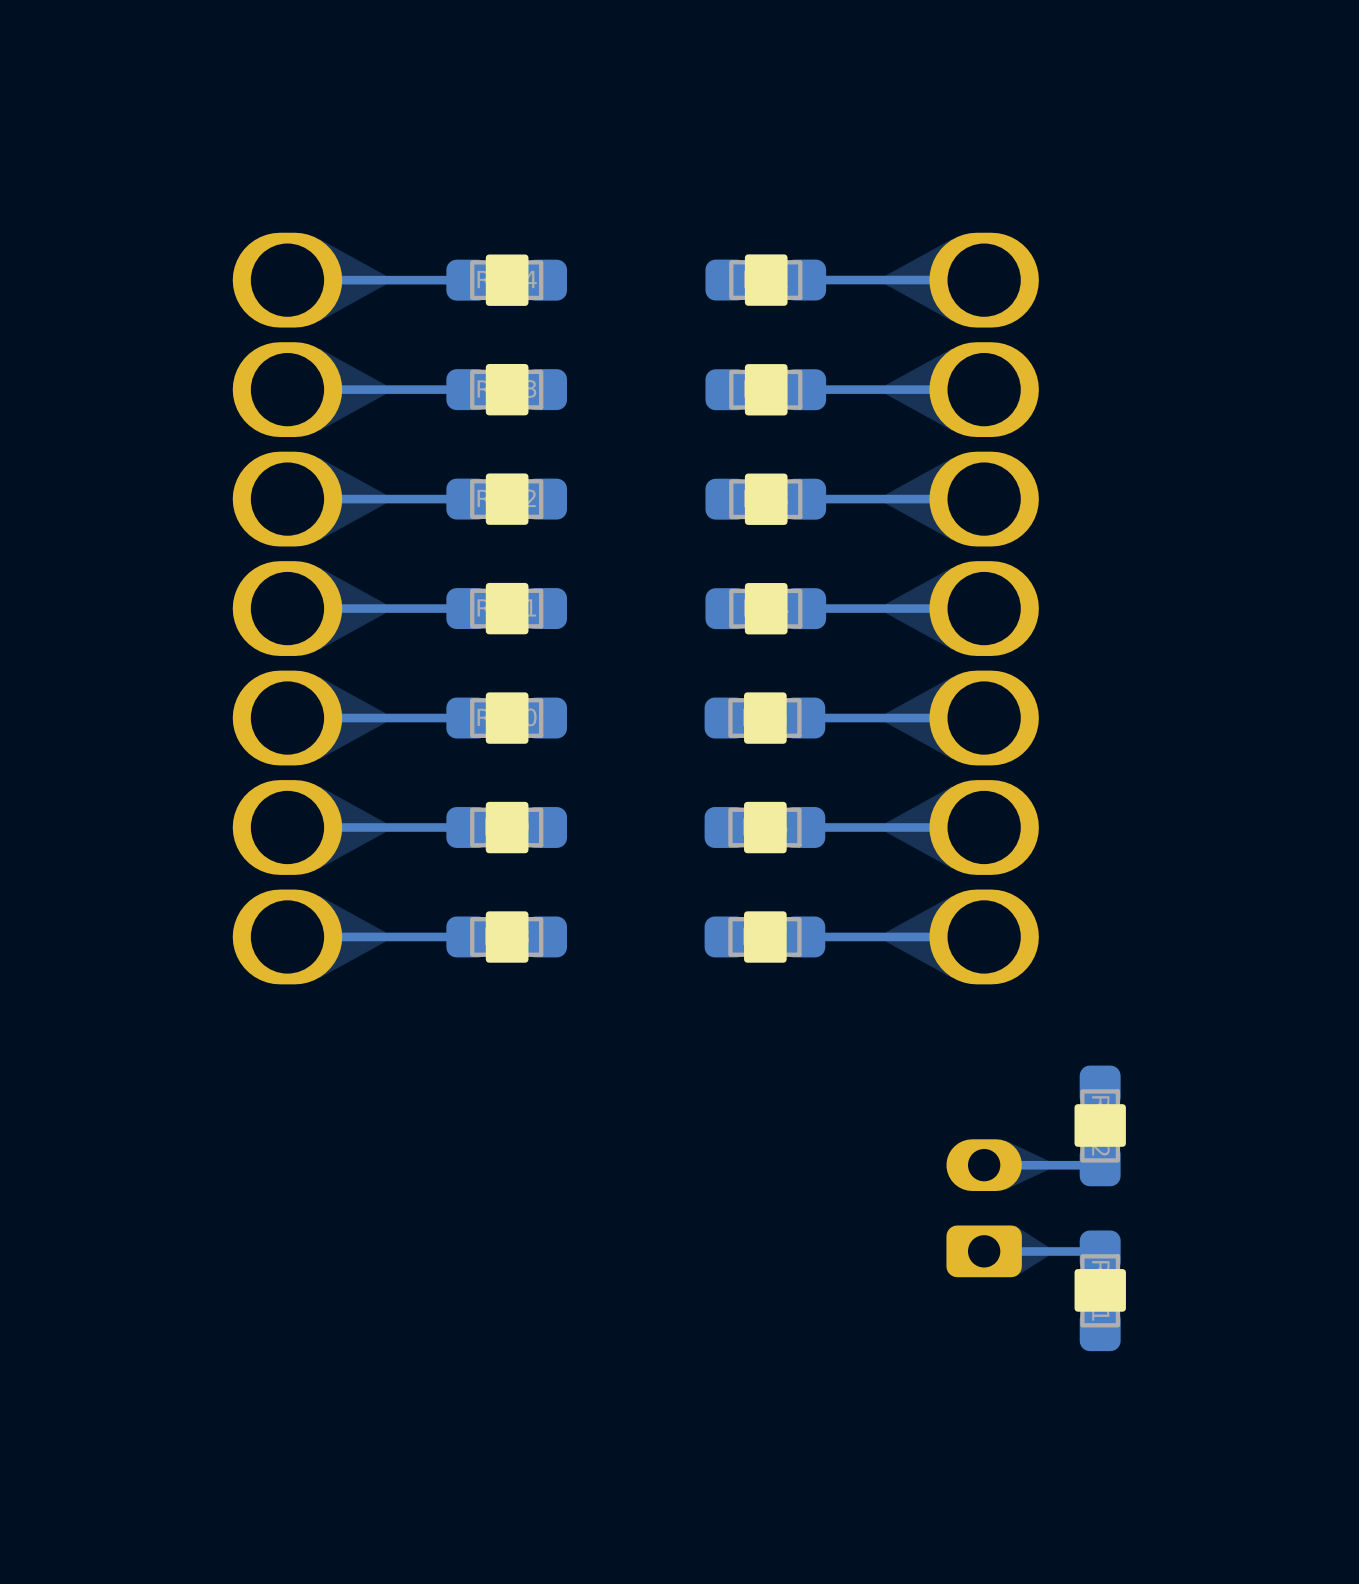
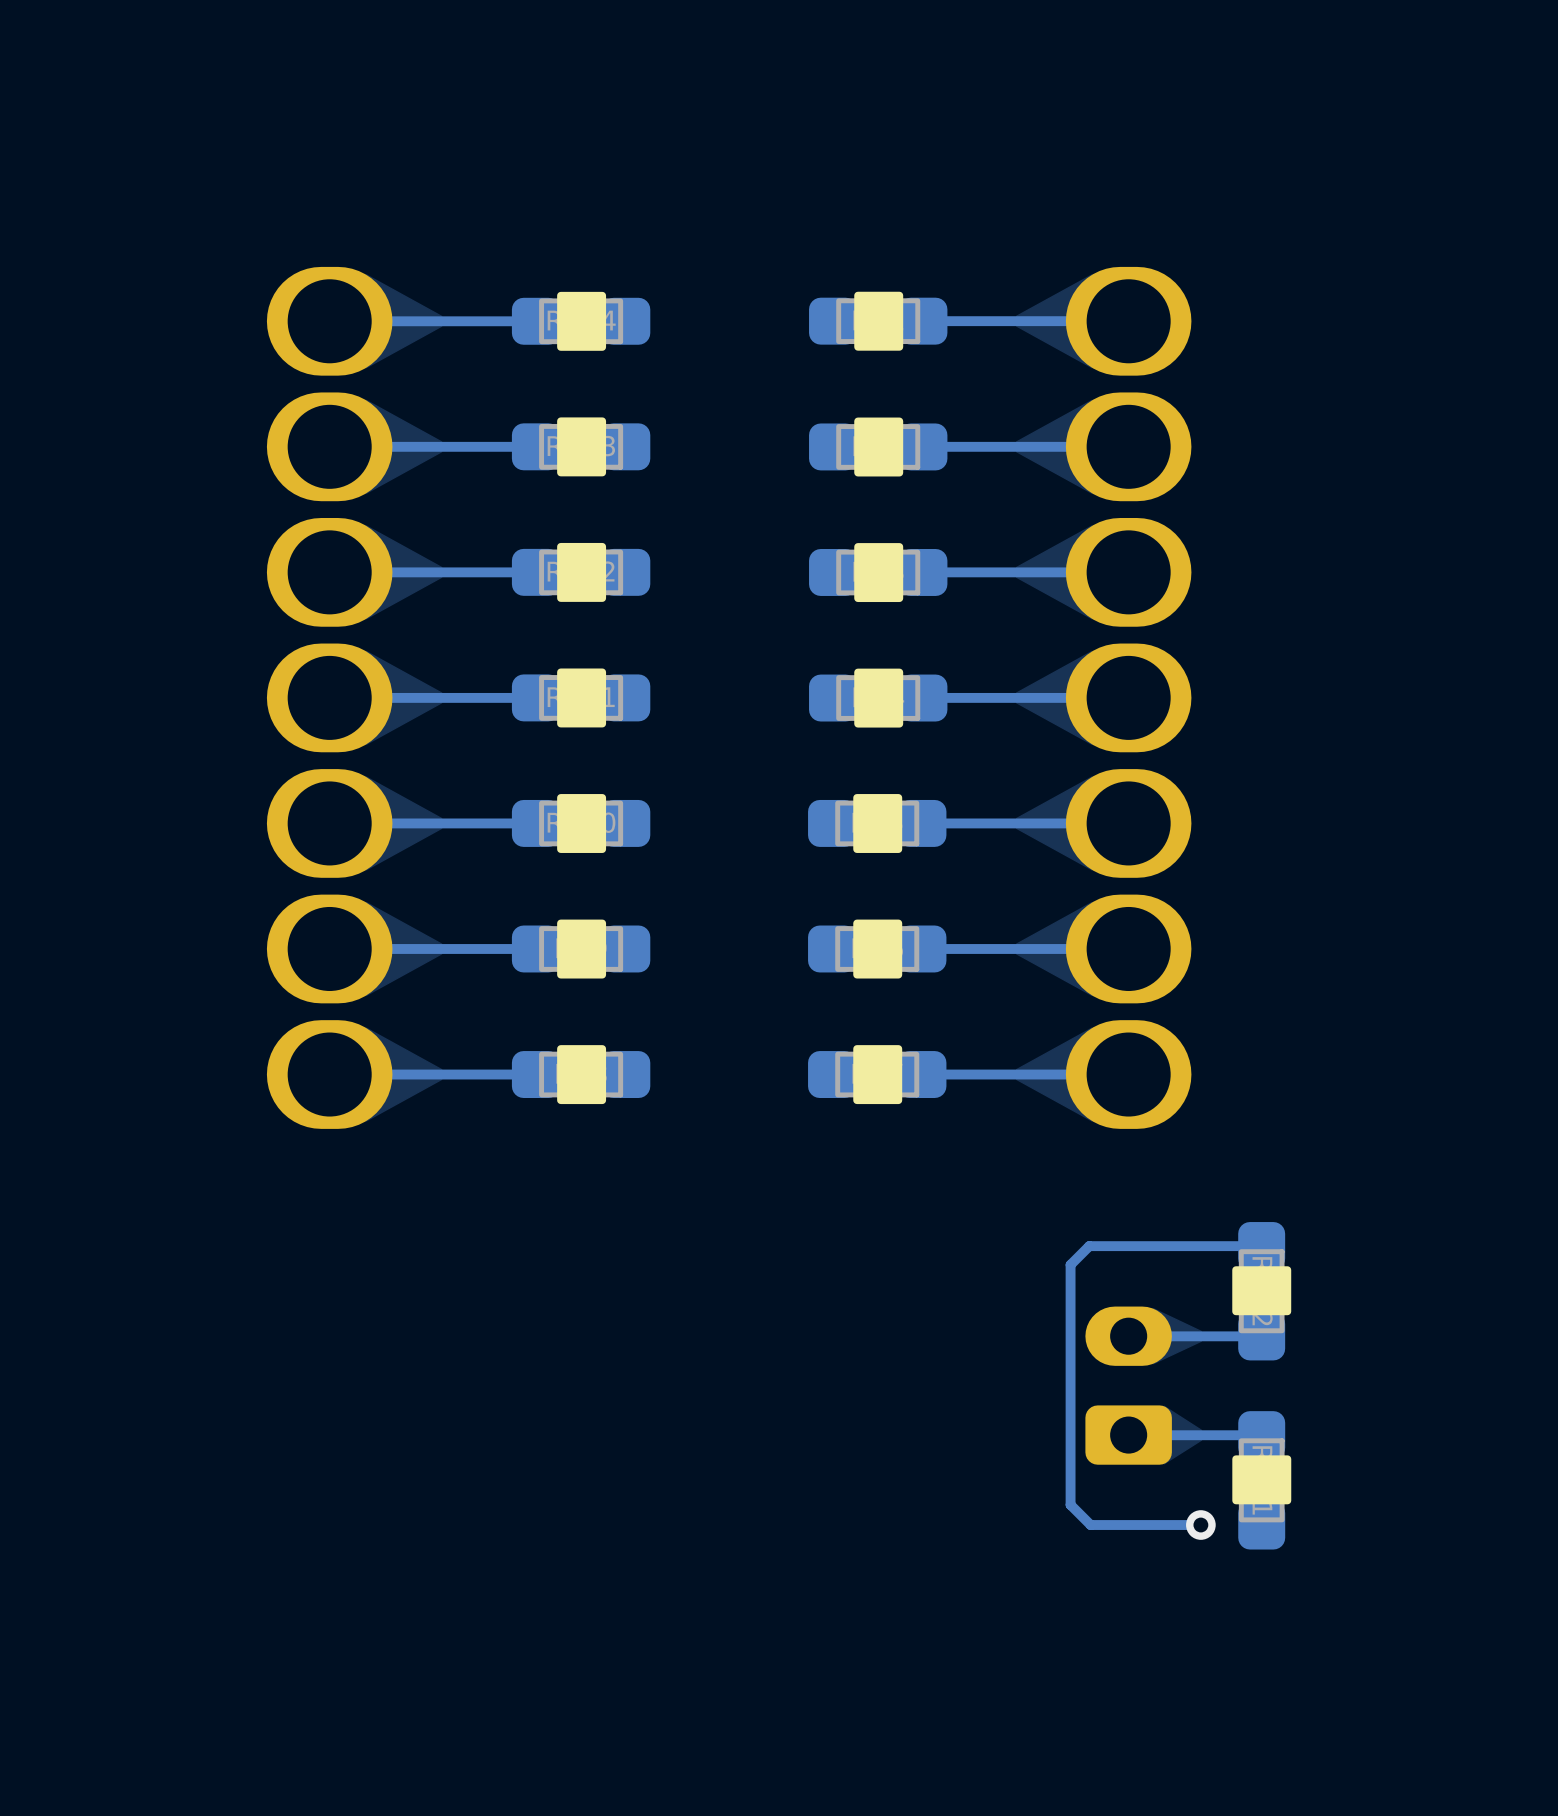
track: none -> (1261, 1246) (1089, 1246) (1070, 1264) (1070, 1504) (1090, 1525) (1200, 1525)
via: none -> (1200, 1525)

